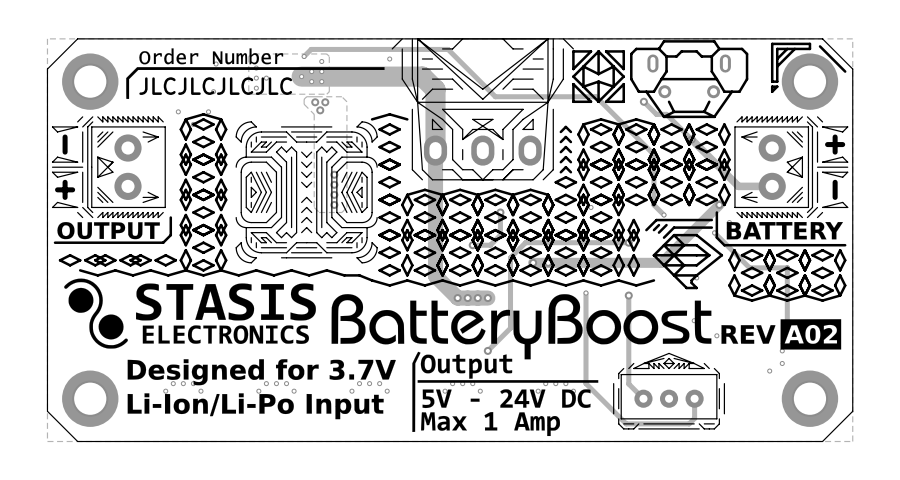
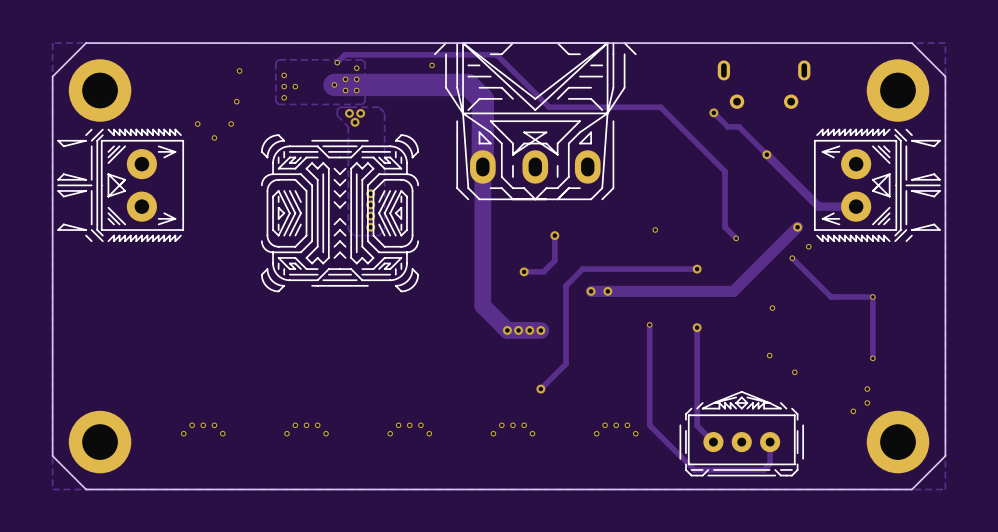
line: (809, 43) (772, 43) (772, 81) (777, 81) (777, 48) (809, 48) (809, 43) -> none
line: (820, 46) (845, 71) -> none
drawing: [57, 48, 844, 437] -> none
line: (658, 48) (666, 56) -> none
line: (658, 48) (636, 48) (631, 53) (631, 79) (638, 91) (653, 91) (661, 79) -> none
line: (719, 48) (711, 56) -> none
line: (719, 48) (742, 48) (747, 53) (747, 79) (739, 91) (724, 91) (716, 79) -> none
line: (719, 48) (714, 41) (664, 41) (658, 48) -> none
line: (787, 48) (777, 58) -> none
line: (794, 48) (777, 66) -> none
line: (591, 51) (573, 51) (573, 69) (591, 51) -> none
line: (598, 51) (598, 74) -> none
line: (598, 51) (573, 76) (598, 101) -> none
line: (598, 51) (623, 76) (598, 101) -> none
line: (623, 51) (606, 51) (623, 69) (623, 51) -> none
line: (666, 56) (666, 71) (661, 79) -> none
line: (711, 56) (701, 56) (696, 51) (681, 51) (676, 56) (666, 56) -> none
line: (711, 56) (711, 71) (716, 79) -> none
line: (598, 74) (613, 66) (613, 86) (598, 81) -> none
line: (598, 74) (583, 66) (583, 86) (598, 81) -> none
line: (716, 79) (661, 79) -> none
line: (598, 81) (598, 101) -> none
line: (573, 84) (591, 101) (573, 101) (573, 84) -> none
line: (623, 84) (623, 101) (606, 101) (623, 84) -> none
text: JLCJLCJLCJLC (215, 86) -> none
line: (777, 86) (772, 91) (772, 86) (777, 86) -> none
line: (646, 91) (664, 116) -> none
line: (731, 91) (714, 116) -> none
line: (669, 101) (674, 111) -> none
line: (709, 101) (704, 111) -> none
line: (674, 111) (664, 116) -> none
line: (704, 111) (714, 116) -> none
line: (704, 111) (674, 111) -> none
line: (714, 116) (664, 116) -> none
line: (185, 119) (180, 129) (185, 139) (190, 129) (185, 119) -> none
line: (203, 119) (213, 124) (203, 129) (193, 124) (203, 119) -> none
line: (221, 119) (203, 114) (185, 119) -> none
line: (221, 119) (226, 129) (221, 139) (216, 129) (221, 119) -> none
line: (407, 119) (389, 114) (372, 119) -> none
line: (389, 124) (379, 129) (389, 134) (399, 129) (389, 124) -> none
line: (583, 124) (578, 134) (583, 144) (588, 134) (583, 124) -> none
line: (601, 124) (591, 129) (601, 134) (611, 129) (601, 124) -> none
line: (618, 124) (601, 119) (583, 124) -> none
line: (618, 124) (613, 134) (618, 144) (623, 134) (618, 124) -> none
line: (636, 124) (626, 129) (636, 134) (646, 129) (636, 124) -> none
line: (653, 124) (636, 119) (618, 124) -> none
line: (653, 124) (648, 134) (653, 144) (658, 134) (653, 124) -> none
line: (671, 124) (661, 129) (671, 134) (681, 129) (671, 124) -> none
line: (689, 124) (694, 134) (689, 144) (684, 134) (689, 124) -> none
line: (706, 124) (696, 129) (706, 134) (716, 129) (706, 124) -> none
line: (724, 124) (729, 134) (724, 144) (719, 134) (724, 124) -> none
line: (570, 131) (565, 126) (560, 131) -> none
line: (65, 137) (65, 152) -> none
line: (203, 137) (213, 142) (203, 147) (193, 142) (203, 137) -> none
line: (835, 137) (835, 152) -> none
line: (389, 142) (399, 147) (389, 152) (379, 147) (389, 142) -> none
line: (570, 142) (565, 137) (560, 142) -> none
line: (601, 142) (591, 147) (601, 152) (611, 147) (601, 142) -> none
line: (636, 142) (626, 147) (636, 152) (646, 147) (636, 142) -> none
line: (671, 142) (661, 147) (671, 152) (681, 147) (671, 142) -> none
line: (706, 142) (696, 147) (706, 152) (716, 147) (706, 142) -> none
line: (185, 144) (180, 154) (185, 164) (190, 154) (185, 144) -> none
line: (221, 144) (226, 154) (221, 164) (216, 154) (221, 144) -> none
line: (842, 144) (827, 144) -> none
line: (583, 149) (588, 159) (583, 169) (578, 159) (583, 149) -> none
line: (618, 149) (613, 159) (618, 169) (623, 159) (618, 149) -> none
line: (653, 149) (648, 159) (653, 169) (658, 159) (653, 149) -> none
line: (689, 149) (694, 159) (689, 169) (684, 159) (689, 149) -> none
line: (724, 149) (729, 159) (724, 169) (719, 159) (724, 149) -> none
line: (570, 152) (565, 147) (560, 152) -> none
line: (185, 154) (180, 164) (185, 174) (190, 164) (185, 154) -> none
line: (203, 154) (213, 159) (203, 164) (193, 159) (203, 154) -> none
line: (221, 154) (226, 164) (221, 174) (216, 164) (221, 154) -> none
line: (389, 159) (399, 164) (389, 169) (379, 164) (389, 159) -> none
line: (583, 159) (578, 169) (583, 179) (588, 169) (583, 159) -> none
line: (601, 159) (591, 164) (601, 169) (611, 164) (601, 159) -> none
line: (618, 159) (613, 169) (618, 179) (623, 169) (618, 159) -> none
line: (636, 159) (626, 164) (636, 169) (646, 164) (636, 159) -> none
line: (653, 159) (648, 169) (653, 179) (658, 169) (653, 159) -> none
line: (671, 159) (661, 164) (671, 169) (681, 164) (671, 159) -> none
line: (689, 159) (684, 169) (689, 179) (694, 169) (689, 159) -> none
line: (706, 159) (696, 164) (706, 169) (716, 164) (706, 159) -> none
line: (724, 159) (729, 169) (724, 179) (719, 169) (724, 159) -> none
line: (570, 162) (565, 157) (560, 162) -> none
line: (203, 172) (213, 177) (203, 182) (193, 177) (203, 172) -> none
line: (570, 172) (565, 167) (560, 172) -> none
line: (389, 177) (379, 182) (389, 187) (399, 182) (389, 177) -> none
line: (565, 177) (555, 182) (565, 187) (575, 182) (565, 177) -> none
line: (601, 177) (591, 182) (601, 187) (611, 182) (601, 177) -> none
line: (636, 177) (626, 182) (636, 187) (646, 182) (636, 177) -> none
line: (671, 177) (661, 182) (671, 187) (681, 182) (671, 177) -> none
line: (706, 177) (696, 182) (706, 187) (716, 182) (706, 177) -> none
line: (185, 179) (180, 189) (185, 199) (190, 189) (185, 179) -> none
line: (221, 179) (226, 189) (221, 199) (216, 189) (221, 179) -> none
line: (65, 182) (65, 197) -> none
line: (835, 182) (835, 197) -> none
line: (583, 184) (578, 194) (583, 204) (588, 194) (583, 184) -> none
line: (618, 184) (613, 194) (618, 204) (623, 194) (618, 184) -> none
line: (653, 184) (648, 194) (653, 204) (658, 194) (653, 184) -> none
line: (689, 184) (684, 194) (689, 204) (694, 194) (689, 184) -> none
line: (724, 184) (729, 194) (724, 204) (719, 194) (724, 184) -> none
line: (72, 189) (57, 189) -> none
line: (185, 189) (180, 199) (185, 209) (190, 199) (185, 189) -> none
line: (203, 189) (213, 194) (203, 199) (193, 194) (203, 189) -> none
line: (221, 189) (226, 199) (221, 209) (216, 199) (221, 189) -> none
line: (389, 194) (399, 199) (389, 204) (379, 199) (389, 194) -> none
line: (407, 194) (402, 204) (407, 215) (412, 204) (407, 194) -> none
line: (424, 194) (435, 199) (424, 204) (414, 199) (424, 194) -> none
line: (442, 194) (424, 189) (407, 194) -> none
line: (442, 194) (437, 204) (442, 215) (447, 204) (442, 194) -> none
line: (460, 194) (470, 199) (460, 204) (450, 199) (460, 194) -> none
line: (477, 194) (460, 189) (442, 194) -> none
line: (477, 194) (472, 204) (477, 215) (482, 204) (477, 194) -> none
line: (495, 194) (505, 199) (495, 204) (485, 199) (495, 194) -> none
line: (513, 194) (495, 189) (477, 194) -> none
line: (513, 194) (507, 204) (513, 215) (518, 204) (513, 194) -> none
line: (530, 194) (520, 199) (530, 204) (540, 199) (530, 194) -> none
line: (548, 194) (530, 189) (513, 194) -> none
line: (548, 194) (543, 204) (548, 215) (553, 204) (548, 194) -> none
line: (565, 194) (555, 199) (565, 204) (575, 199) (565, 194) -> none
line: (583, 194) (588, 204) (583, 215) (578, 204) (583, 194) -> none
line: (601, 194) (611, 199) (601, 204) (591, 199) (601, 194) -> none
line: (618, 194) (623, 204) (618, 215) (613, 204) (618, 194) -> none
line: (636, 194) (626, 199) (636, 204) (646, 199) (636, 194) -> none
line: (671, 194) (661, 199) (671, 204) (681, 199) (671, 194) -> none
line: (706, 194) (696, 199) (706, 204) (716, 199) (706, 194) -> none
line: (203, 207) (193, 212) (203, 217) (213, 212) (203, 207) -> none
line: (389, 212) (399, 217) (389, 222) (379, 217) (389, 212) -> none
line: (424, 212) (435, 217) (424, 222) (414, 217) (424, 212) -> none
line: (460, 212) (470, 217) (460, 222) (450, 217) (460, 212) -> none
line: (495, 212) (485, 217) (495, 222) (505, 217) (495, 212) -> none
line: (530, 212) (540, 217) (530, 222) (520, 217) (530, 212) -> none
line: (565, 212) (575, 217) (565, 222) (555, 217) (565, 212) -> none
line: (601, 212) (611, 217) (601, 222) (591, 217) (601, 212) -> none
line: (716, 212) (716, 237) (724, 245) (845, 245) -> none
line: (185, 215) (180, 225) (185, 235) (190, 225) (185, 215) -> none
line: (221, 215) (226, 225) (221, 235) (216, 225) (221, 215) -> none
line: (170, 217) (170, 235) (163, 242) (55, 242) -> none
line: (407, 220) (402, 230) (407, 240) (412, 230) (407, 220) -> none
line: (442, 220) (437, 230) (442, 240) (447, 230) (442, 220) -> none
line: (477, 220) (472, 230) (477, 240) (482, 230) (477, 220) -> none
line: (513, 220) (507, 230) (513, 240) (518, 230) (513, 220) -> none
line: (548, 220) (543, 230) (548, 240) (553, 230) (548, 220) -> none
line: (583, 220) (588, 230) (583, 240) (578, 230) (583, 220) -> none
line: (618, 220) (623, 230) (618, 240) (613, 230) (618, 220) -> none
line: (633, 220) (628, 230) (633, 240) (638, 230) (633, 220) -> none
line: (711, 220) (656, 220) (646, 230) -> none
line: (185, 225) (180, 235) (185, 245) (190, 235) (185, 225) -> none
line: (203, 225) (213, 230) (203, 235) (193, 230) (203, 225) -> none
line: (221, 225) (226, 235) (221, 245) (216, 235) (221, 225) -> none
line: (658, 225) (653, 230) -> none
line: (666, 225) (658, 232) -> none
line: (711, 227) (674, 227) (664, 237) -> none
line: (389, 230) (399, 235) (389, 240) (379, 235) (389, 230) -> none
line: (407, 230) (402, 240) (407, 250) (412, 240) (407, 230) -> none
line: (424, 230) (435, 235) (424, 240) (414, 235) (424, 230) -> none
line: (442, 230) (447, 240) (442, 250) (437, 240) (442, 230) -> none
line: (460, 230) (450, 235) (460, 240) (470, 235) (460, 230) -> none
line: (477, 230) (482, 240) (477, 250) (472, 240) (477, 230) -> none
line: (495, 230) (505, 235) (495, 240) (485, 235) (495, 230) -> none
line: (513, 230) (518, 240) (513, 250) (507, 240) (513, 230) -> none
line: (530, 230) (540, 235) (530, 240) (520, 235) (530, 230) -> none
line: (548, 230) (553, 240) (548, 250) (543, 240) (548, 230) -> none
line: (565, 230) (575, 235) (565, 240) (555, 235) (565, 230) -> none
line: (583, 230) (588, 240) (583, 250) (578, 240) (583, 230) -> none
line: (601, 230) (611, 235) (601, 240) (591, 235) (601, 230) -> none
line: (618, 230) (623, 240) (618, 250) (613, 240) (618, 230) -> none
line: (633, 230) (638, 240) (633, 250) (628, 240) (633, 230) -> none
line: (674, 235) (684, 245) (664, 265) (696, 265) (709, 255) -> none
line: (674, 235) (653, 255) -> none
line: (674, 235) (696, 235) (721, 255) (696, 275) -> none
line: (203, 242) (193, 247) (203, 252) (213, 247) (203, 242) -> none
line: (389, 247) (379, 252) (389, 257) (399, 252) (389, 247) -> none
line: (424, 247) (414, 252) (424, 257) (435, 252) (424, 247) -> none
line: (460, 247) (470, 252) (460, 257) (450, 252) (460, 247) -> none
line: (495, 247) (505, 252) (495, 257) (485, 252) (495, 247) -> none
line: (530, 247) (540, 252) (530, 257) (520, 252) (530, 247) -> none
line: (565, 247) (575, 252) (565, 257) (555, 252) (565, 247) -> none
line: (601, 247) (611, 252) (601, 257) (591, 252) (601, 247) -> none
line: (734, 250) (739, 260) (734, 270) (729, 260) (734, 250) -> none
line: (752, 250) (742, 255) (752, 260) (762, 255) (752, 250) -> none
line: (769, 250) (774, 260) (769, 270) (764, 260) (769, 250) -> none
line: (787, 250) (777, 255) (787, 260) (797, 255) (787, 250) -> none
line: (804, 250) (809, 260) (804, 270) (799, 260) (804, 250) -> none
line: (822, 250) (812, 255) (822, 260) (832, 255) (822, 250) -> none
line: (840, 250) (835, 260) (840, 270) (845, 260) (840, 250) -> none
line: (70, 255) (60, 260) (70, 265) (80, 260) (70, 255) -> none
line: (95, 255) (105, 260) (95, 265) (85, 260) (95, 255) -> none
line: (105, 255) (115, 260) (105, 265) (95, 260) (105, 255) -> none
line: (130, 255) (140, 260) (130, 265) (120, 260) (130, 255) -> none
line: (140, 255) (130, 260) (140, 265) (150, 260) (140, 255) -> none
line: (165, 255) (175, 260) (165, 265) (155, 260) (165, 255) -> none
line: (407, 255) (402, 265) (407, 275) (412, 265) (407, 255) -> none
line: (442, 255) (447, 265) (442, 275) (437, 265) (442, 255) -> none
line: (477, 255) (482, 265) (477, 275) (472, 265) (477, 255) -> none
line: (513, 255) (518, 265) (513, 275) (507, 265) (513, 255) -> none
line: (548, 255) (553, 265) (548, 275) (543, 265) (548, 255) -> none
line: (583, 255) (588, 265) (583, 275) (578, 265) (583, 255) -> none
line: (618, 255) (623, 265) (618, 275) (613, 265) (618, 255) -> none
line: (633, 255) (638, 265) (633, 275) (628, 265) (633, 255) -> none
line: (653, 255) (686, 287) (696, 287) (691, 282) (696, 275) -> none
line: (709, 255) (696, 245) (664, 245) (684, 265) (674, 275) (696, 275) -> none
line: (709, 255) (653, 255) -> none
line: (203, 260) (213, 265) (203, 270) (193, 265) (203, 260) -> none
line: (389, 265) (379, 270) (389, 275) (399, 270) (389, 265) -> none
line: (424, 265) (435, 270) (424, 275) (414, 270) (424, 265) -> none
line: (460, 265) (470, 270) (460, 275) (450, 270) (460, 265) -> none
line: (495, 265) (505, 270) (495, 275) (485, 270) (495, 265) -> none
line: (530, 265) (540, 270) (530, 275) (520, 270) (530, 265) -> none
line: (565, 265) (575, 270) (565, 275) (555, 270) (565, 265) -> none
line: (601, 265) (611, 270) (601, 275) (591, 270) (601, 265) -> none
line: (752, 267) (742, 272) (752, 277) (762, 272) (752, 267) -> none
line: (787, 267) (797, 272) (787, 277) (777, 272) (787, 267) -> none
line: (822, 267) (832, 272) (822, 277) (812, 272) (822, 267) -> none
line: (185, 270) (168, 275) (150, 270) (133, 275) (115, 270) (97, 275) (80, 270) -> none
line: (185, 270) (190, 260) (185, 250) (180, 260) (185, 270) -> none
line: (221, 270) (238, 275) (256, 270) (273, 275) (291, 270) (309, 275) (326, 270) (344, 275) (359, 275) (389, 285) (407, 280) (424, 285) (442, 280) (460, 285) (477, 280) (495, 285) (513, 280) (530, 285) (548, 280) (565, 285) (583, 280) (601, 285) (618, 280) (636, 285) (653, 280) -> none
line: (221, 270) (203, 275) (185, 270) -> none
line: (221, 270) (216, 260) (221, 250) (226, 260) (221, 270) -> none
line: (752, 285) (762, 290) (752, 295) (742, 290) (752, 285) -> none
line: (787, 285) (797, 290) (787, 295) (777, 290) (787, 285) -> none
line: (822, 285) (832, 290) (822, 295) (812, 290) (822, 285) -> none
line: (734, 295) (729, 285) (734, 275) (739, 285) (734, 295) -> none
line: (769, 295) (752, 300) (734, 295) -> none
line: (769, 295) (764, 285) (769, 275) (774, 285) (769, 295) -> none
line: (804, 295) (787, 300) (769, 295) -> none
line: (804, 295) (809, 285) (804, 275) (799, 285) (804, 295) -> none
line: (840, 295) (822, 300) (804, 295) -> none
line: (840, 295) (845, 285) (840, 275) (835, 285) (840, 295) -> none

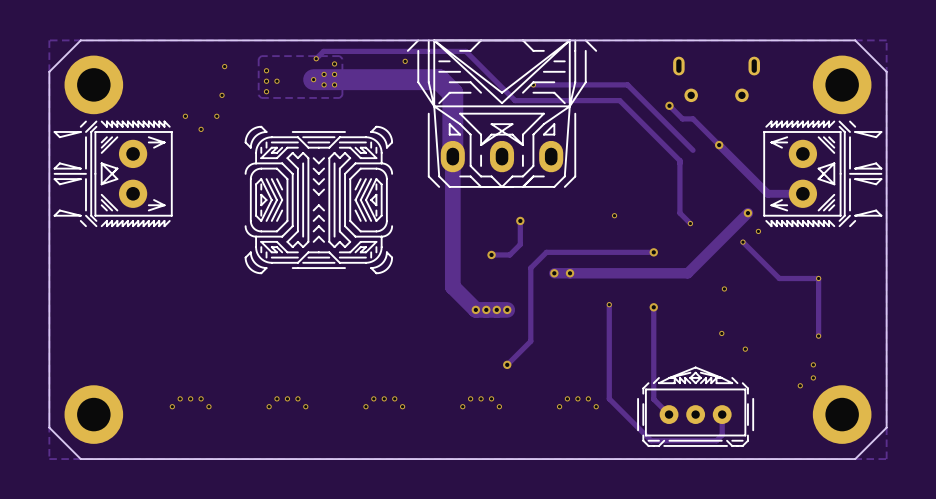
track: none -> (533, 84) (627, 84) (693, 150)
via: none -> (533, 84)
zone outline: (379, 107) (384, 112) (384, 230) (379, 235) (353, 235) (348, 230) (348, 126) (337, 115) (337, 110) (340, 107) (379, 107) -> none
via: (349, 113) -> none
via: (360, 113) -> none
via: (355, 122) -> none
via: (370, 193) -> none
via: (370, 204) -> none
via: (370, 216) -> none
via: (370, 227) -> none

